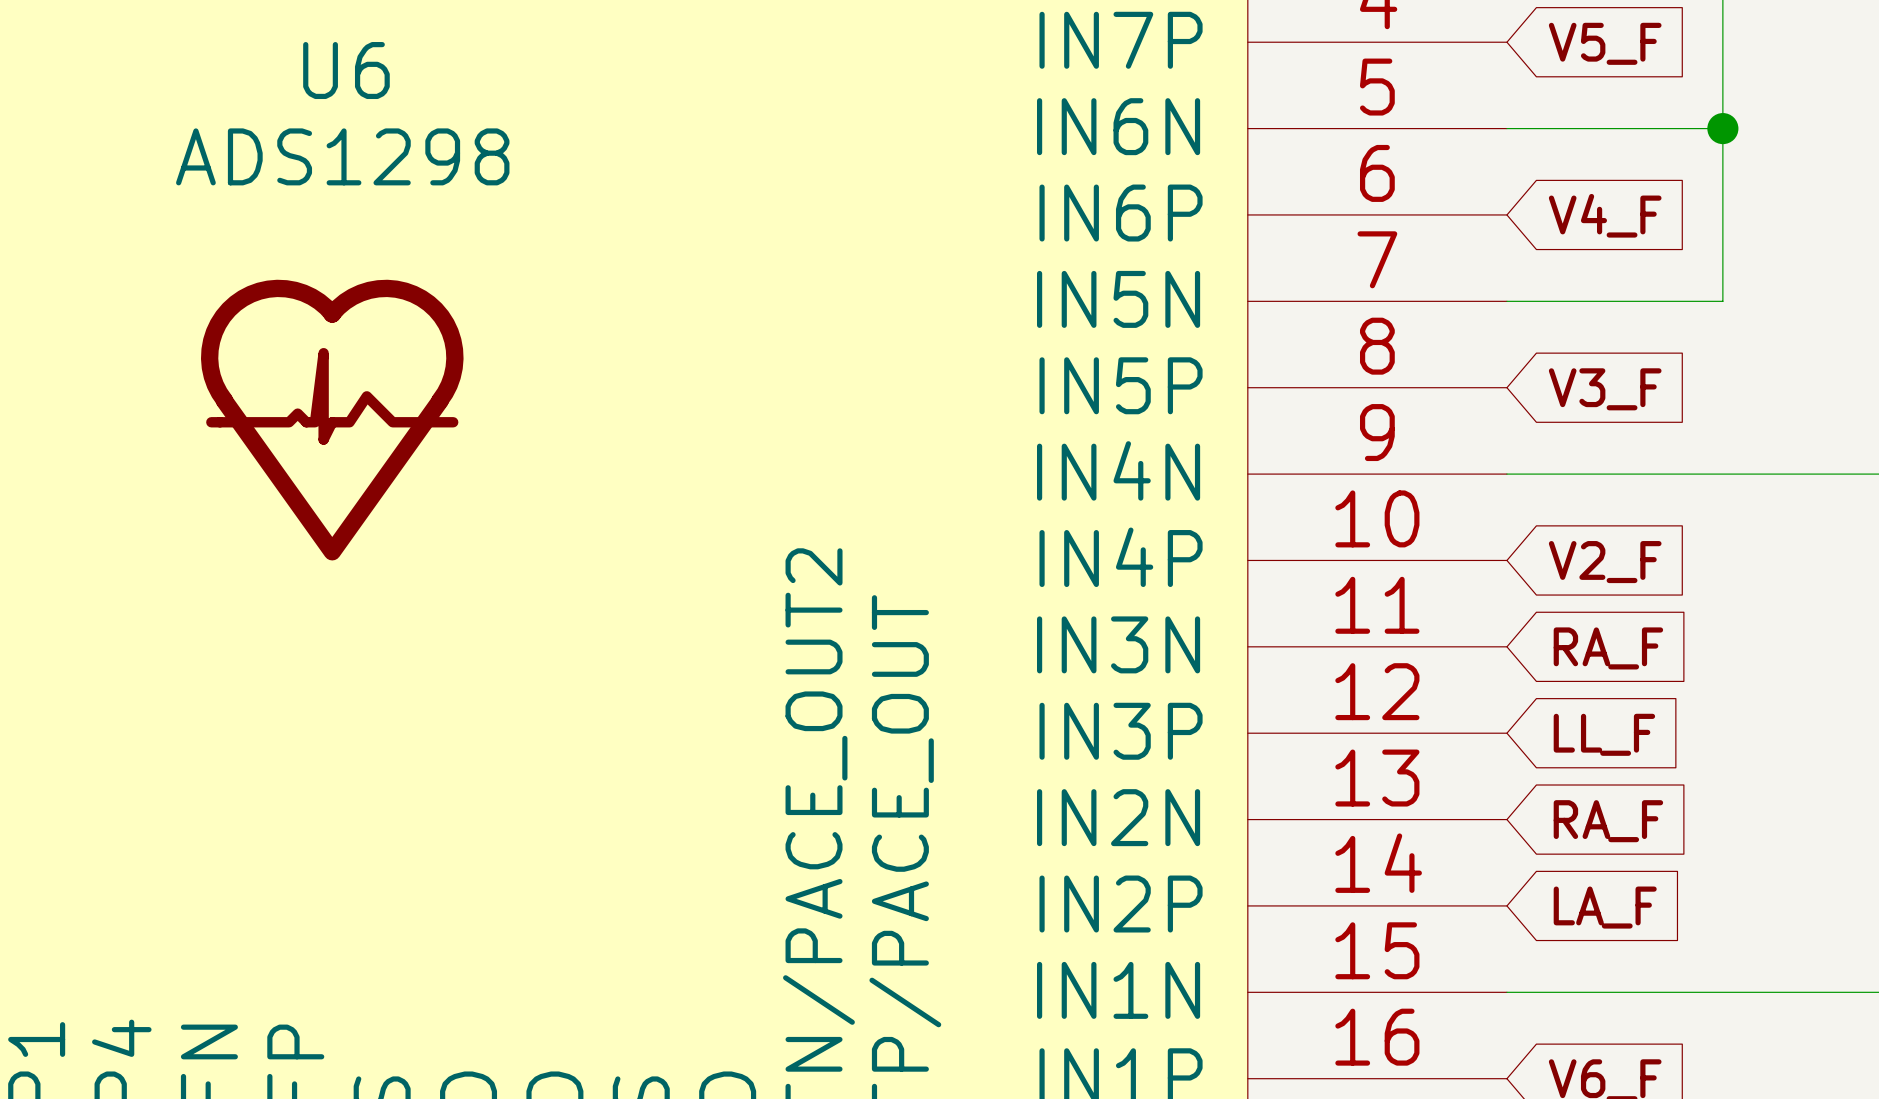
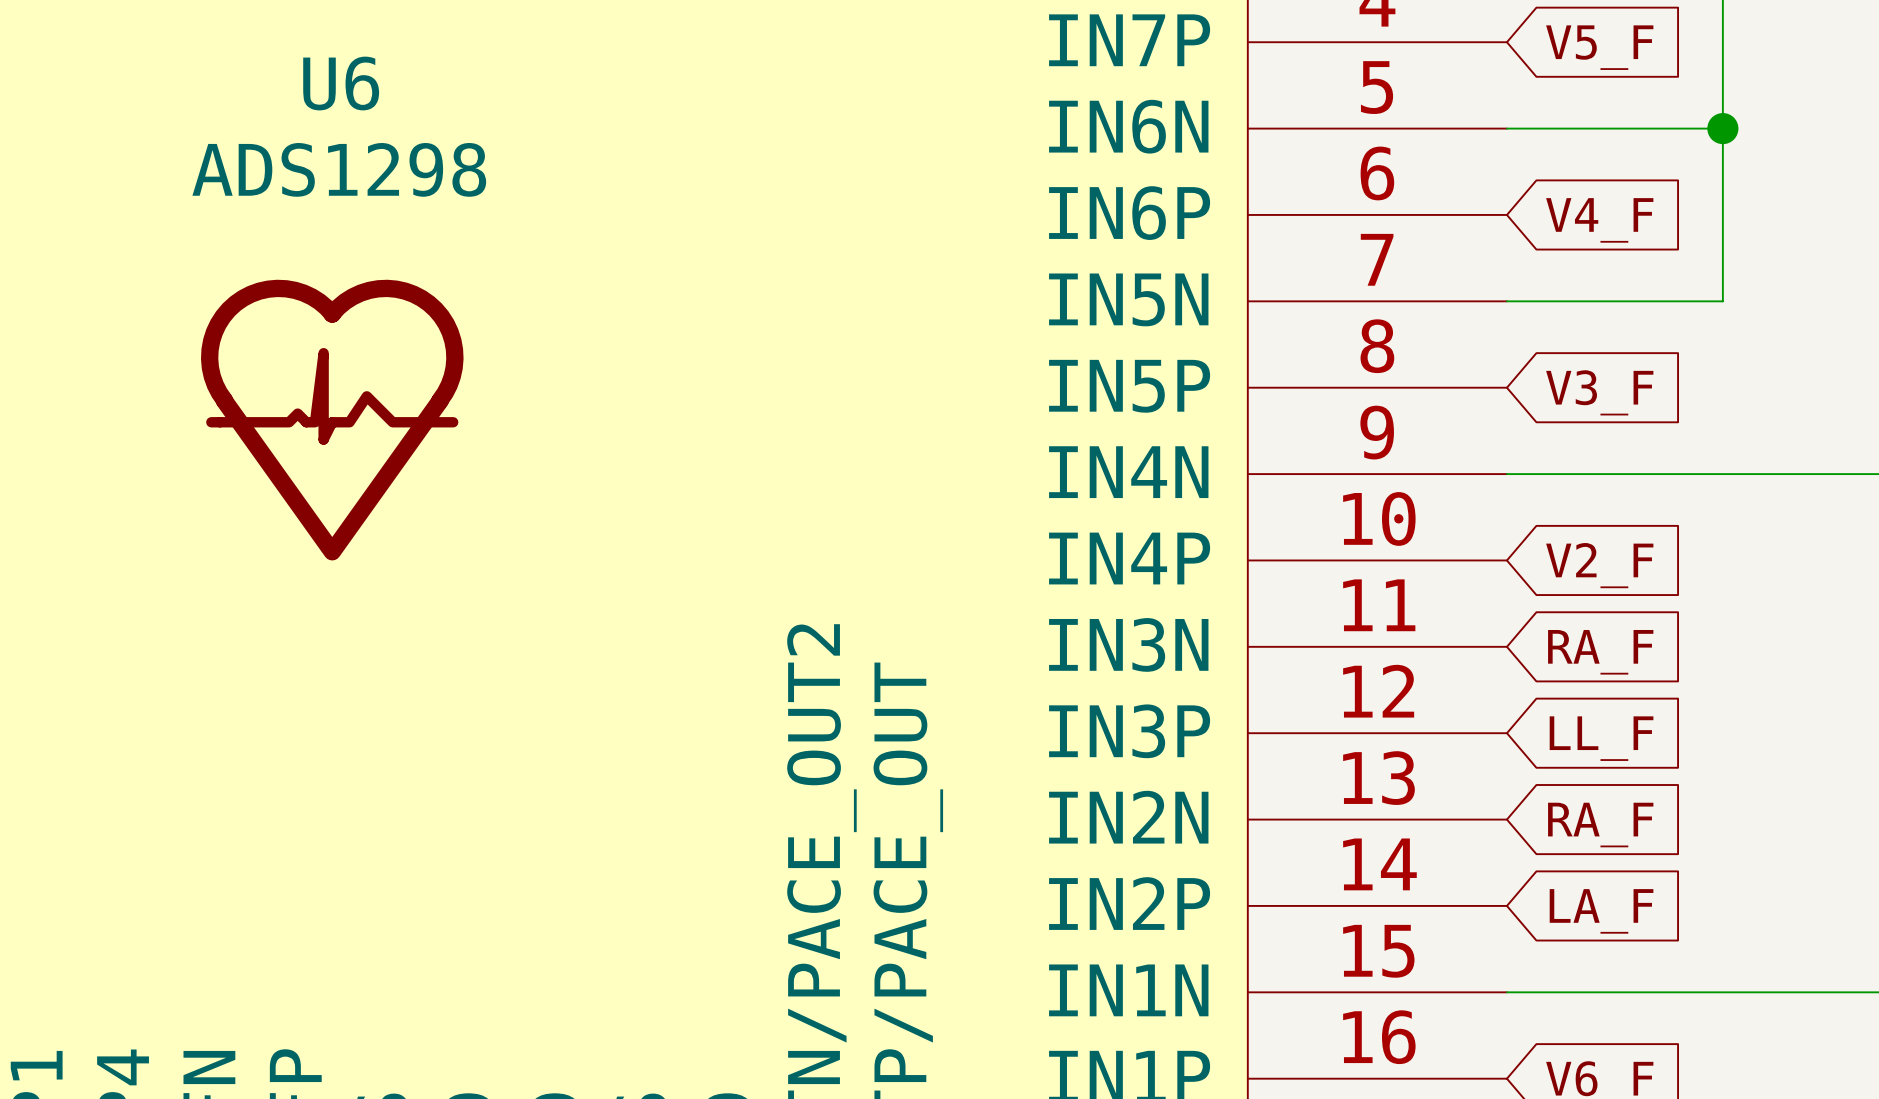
U6 name position: U6 (346, 70) -> U6 (341, 83)
U6 value position: ADS1298 (342, 156) -> ADS1298 (339, 169)

